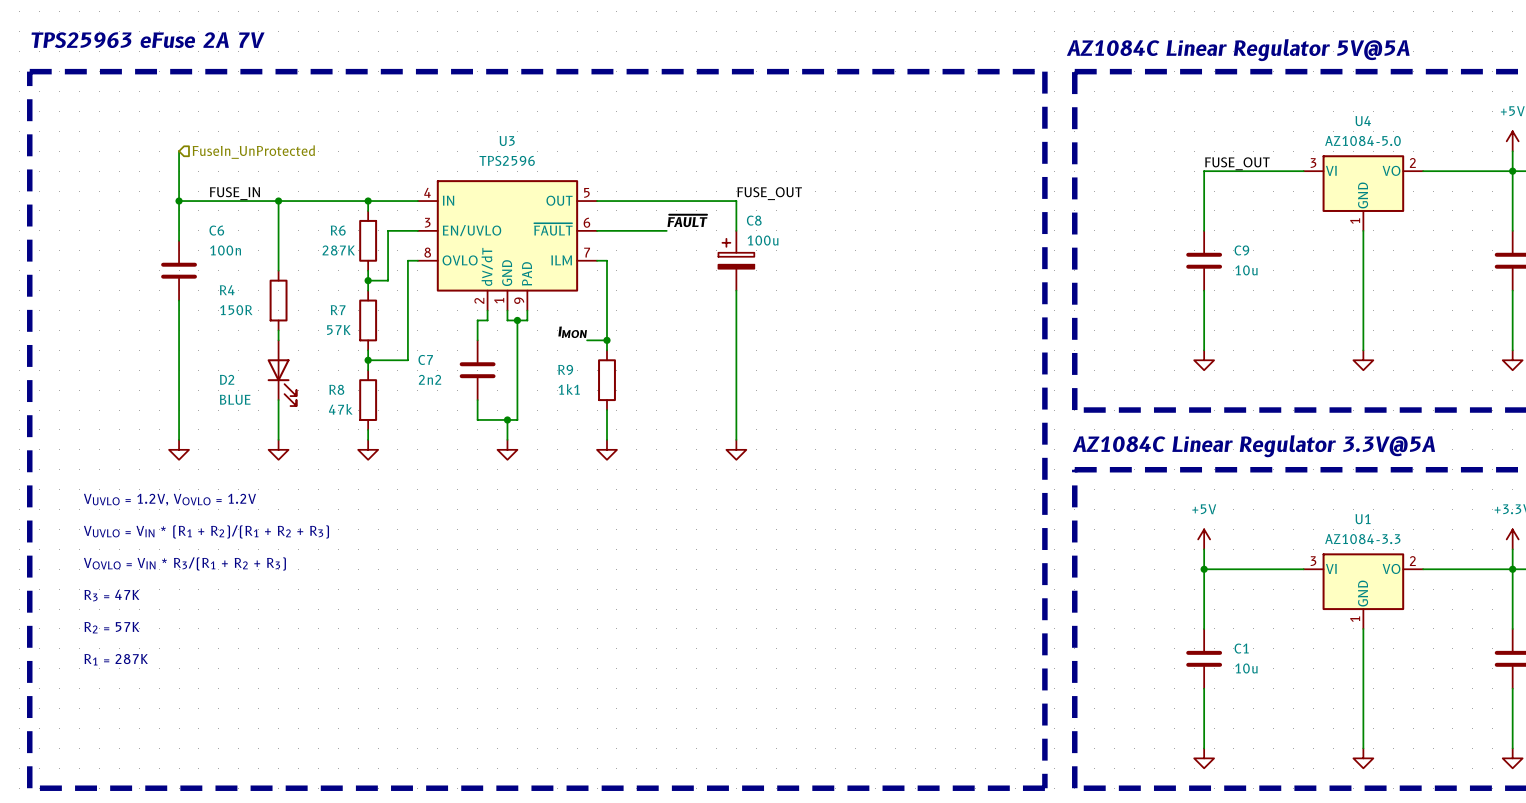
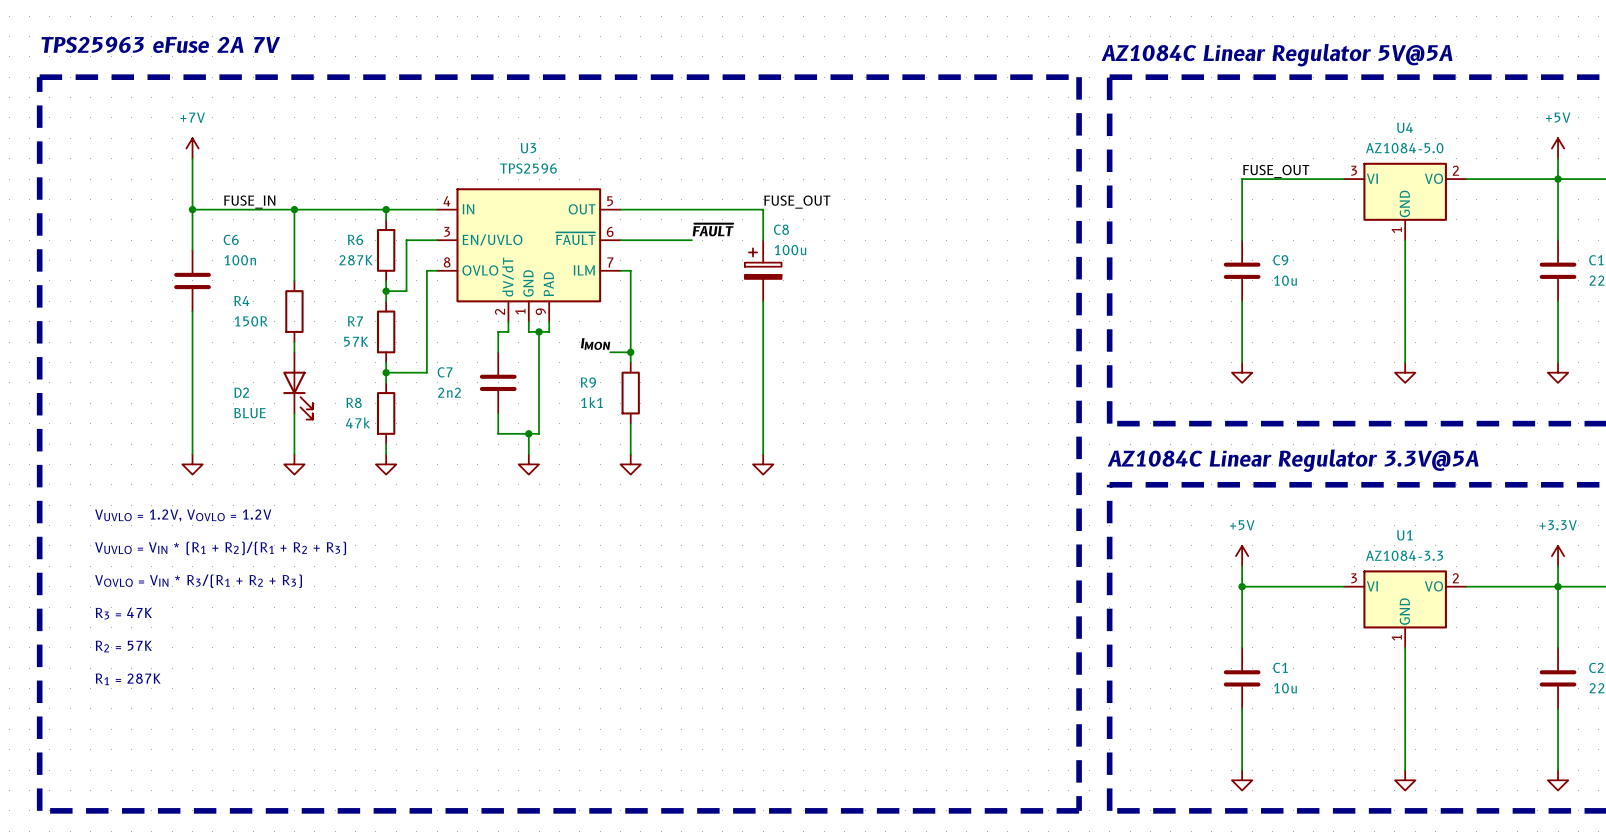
power symbol: none -> +7V (192, 148)
hierarchical label: FuseIn_UnProtected (253, 152) -> none

